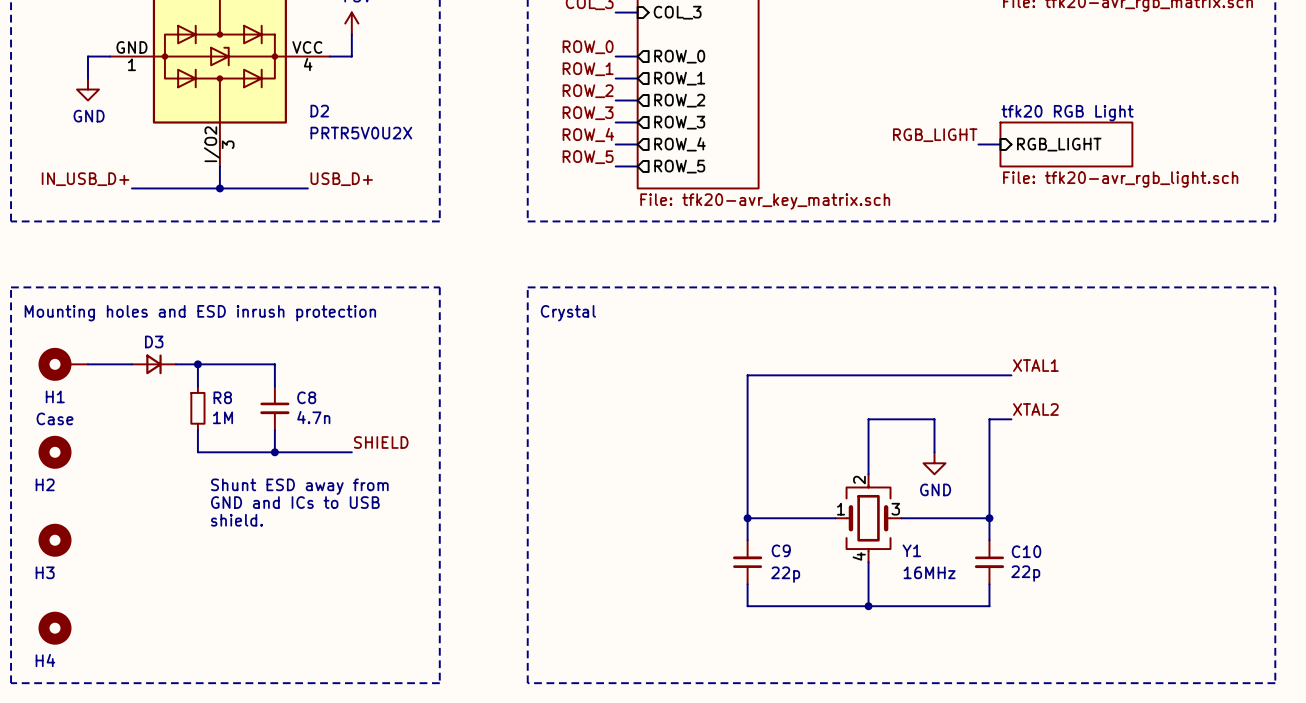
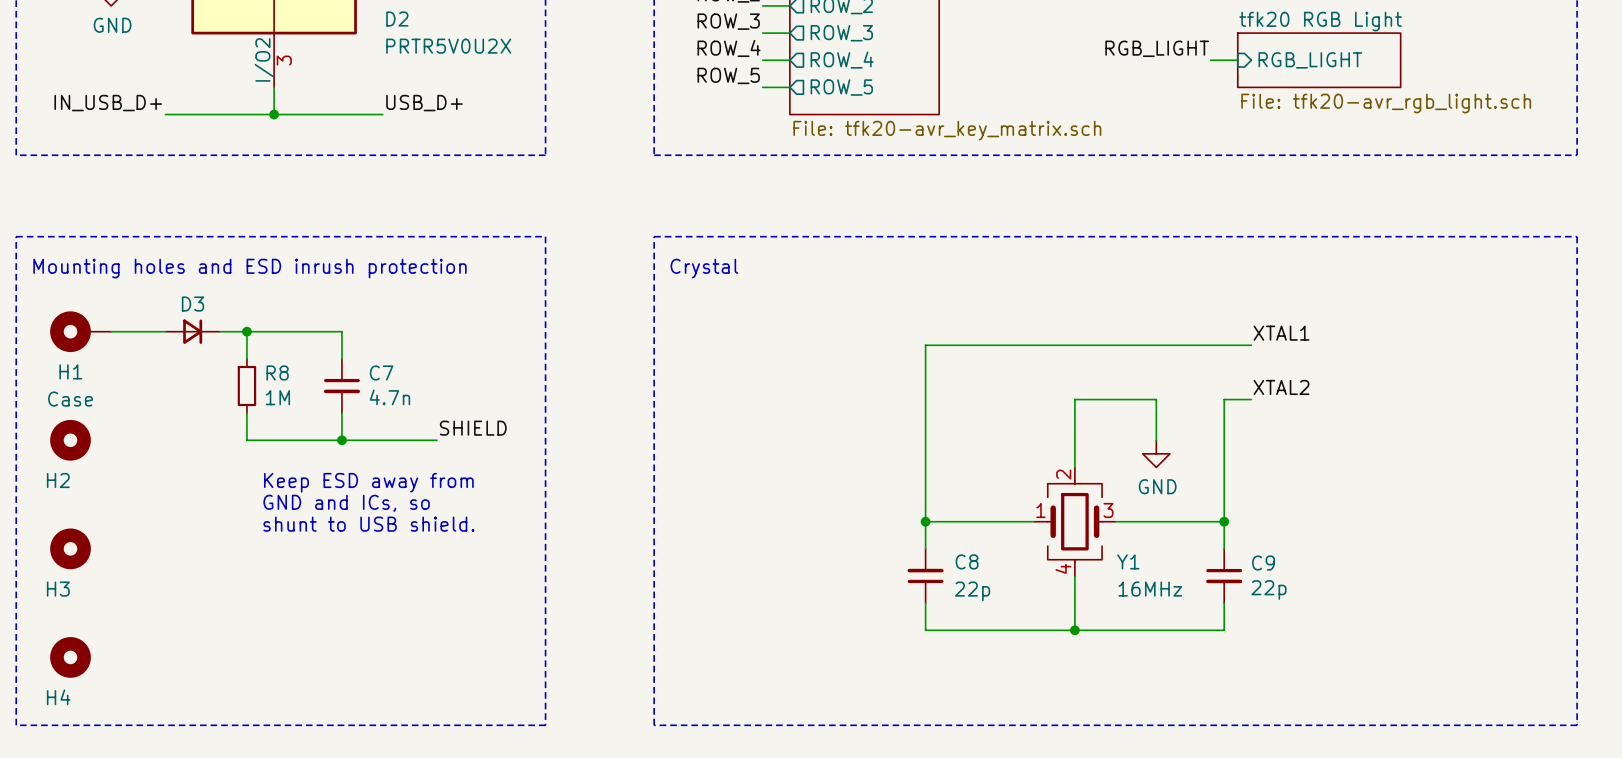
C8 name: C8 (306, 397) -> C7 (381, 372)
text: Shunt ESD away from (299, 486) -> Keep ESD away from (368, 482)
text: GND and ICs to USB (295, 502) -> GND and ICs, so (346, 503)
text: shield. (237, 520) -> shunt to USB shield. (368, 524)
C9 name: C9 (781, 550) -> C8 (967, 561)
C10 name: C10 (1026, 551) -> C9 (1263, 563)

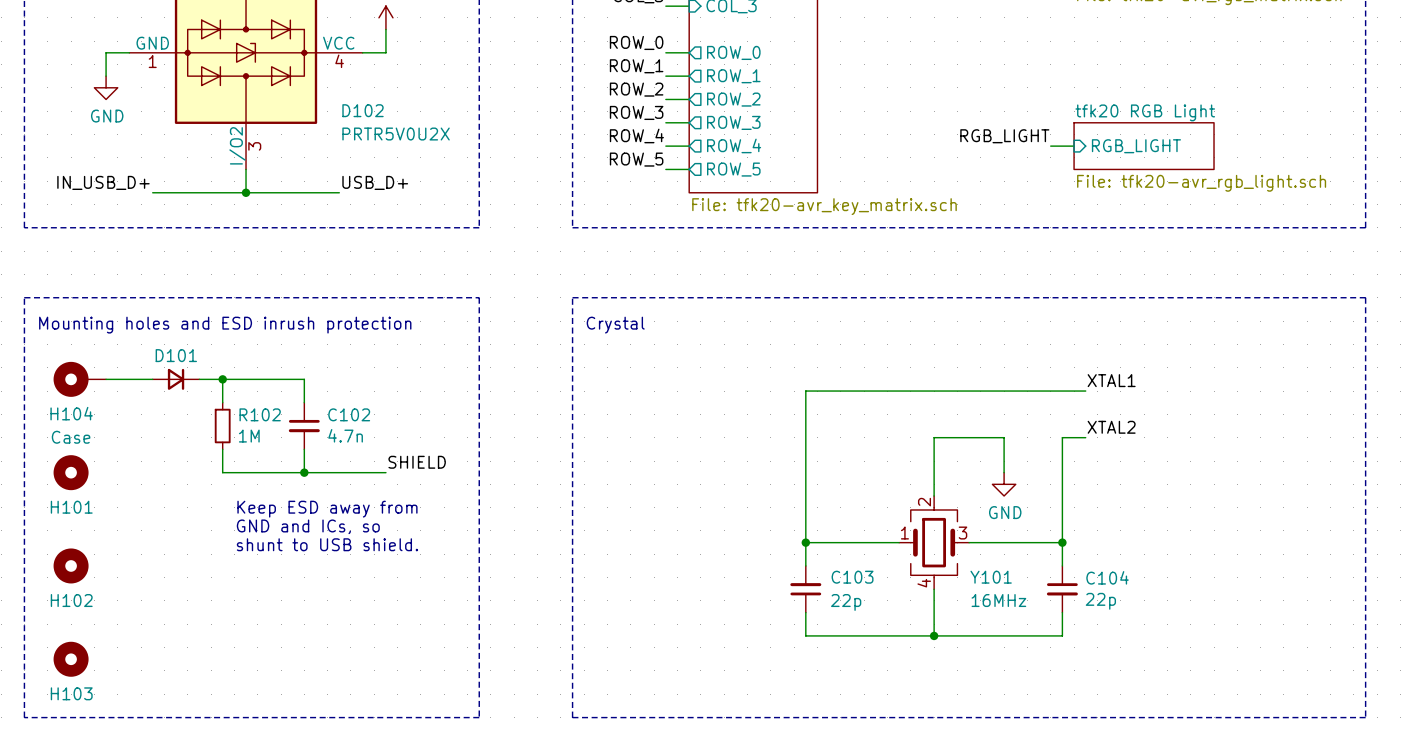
D2 name: D2 (397, 19) -> D102 (363, 110)
D3 name: D3 (192, 304) -> D101 (176, 355)
H1 name: H1 (70, 371) -> H104 (71, 413)
R8 name: R8 (277, 372) -> R102 (260, 414)
C7 name: C7 (381, 372) -> C102 (349, 414)
H2 name: H2 (58, 480) -> H101 (71, 507)
C8 name: C8 (967, 561) -> C103 (852, 577)
Y1 name: Y1 (1128, 561) -> Y101 (991, 577)
C9 name: C9 (1263, 563) -> C104 (1107, 577)
H3 name: H3 (58, 589) -> H102 (71, 600)
H4 name: H4 (58, 697) -> H103 (71, 693)

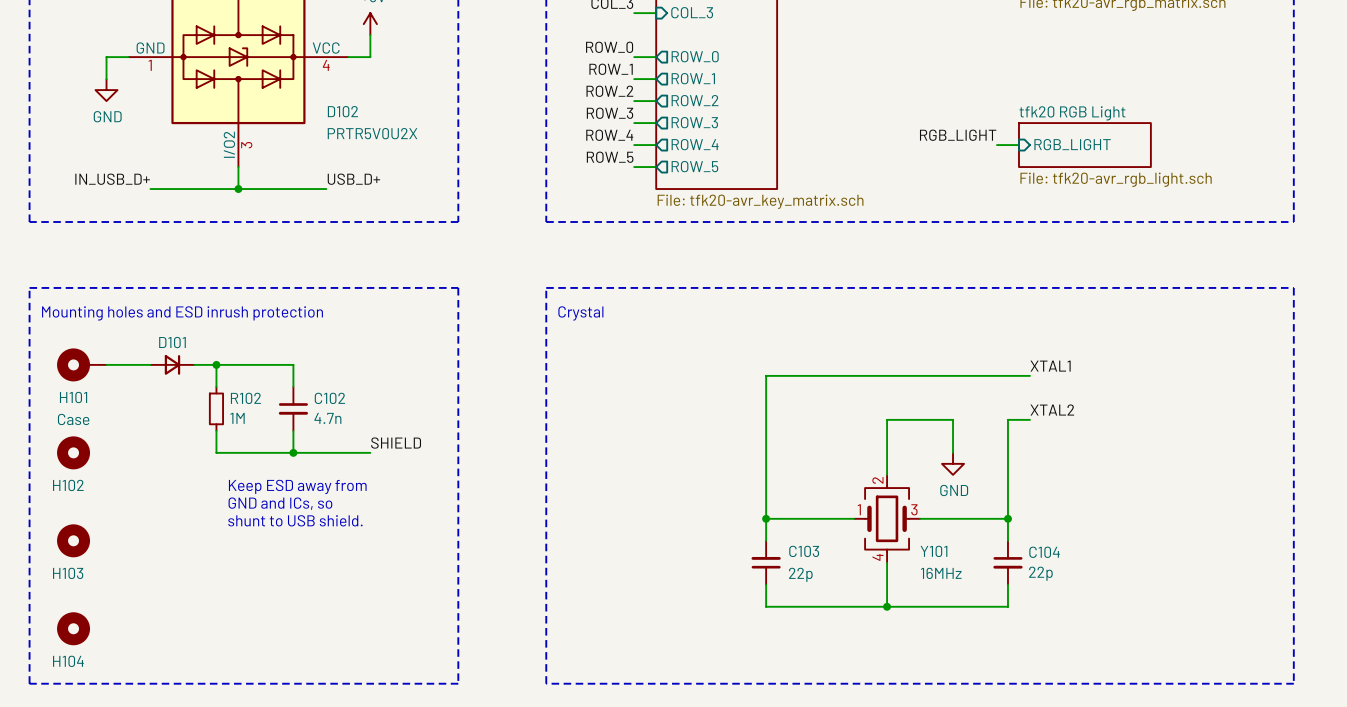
H104 name: H104 (71, 413) -> H101 (73, 397)
H101 name: H101 (71, 507) -> H102 (68, 485)
H102 name: H102 (71, 600) -> H103 (68, 573)
H103 name: H103 (71, 693) -> H104 (68, 661)

